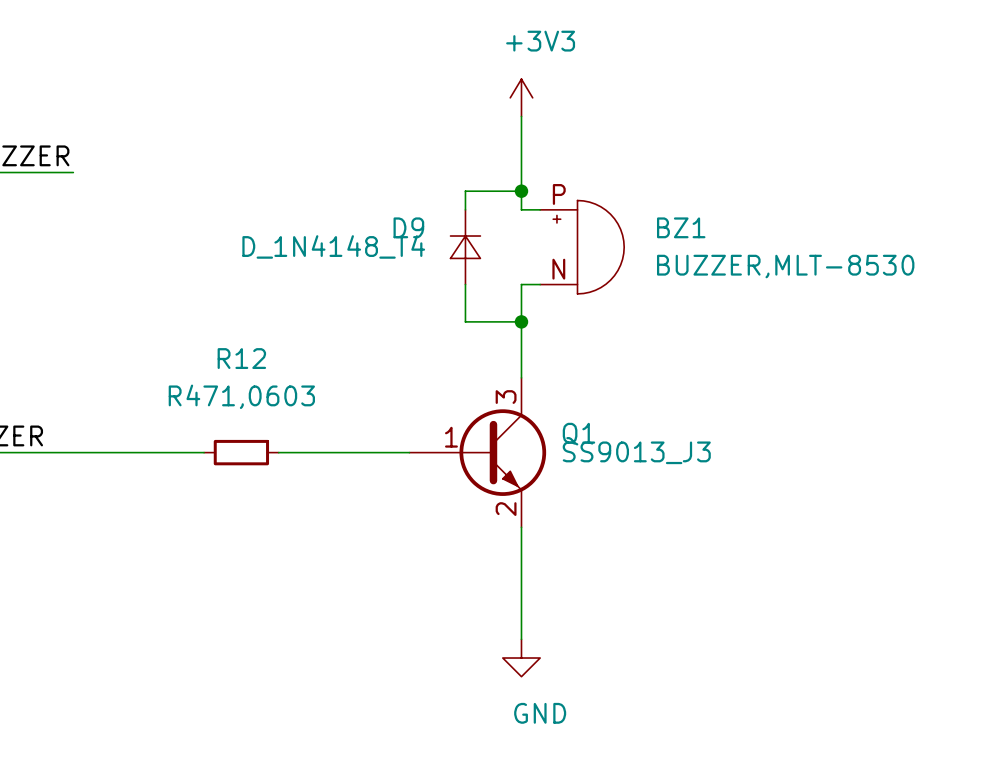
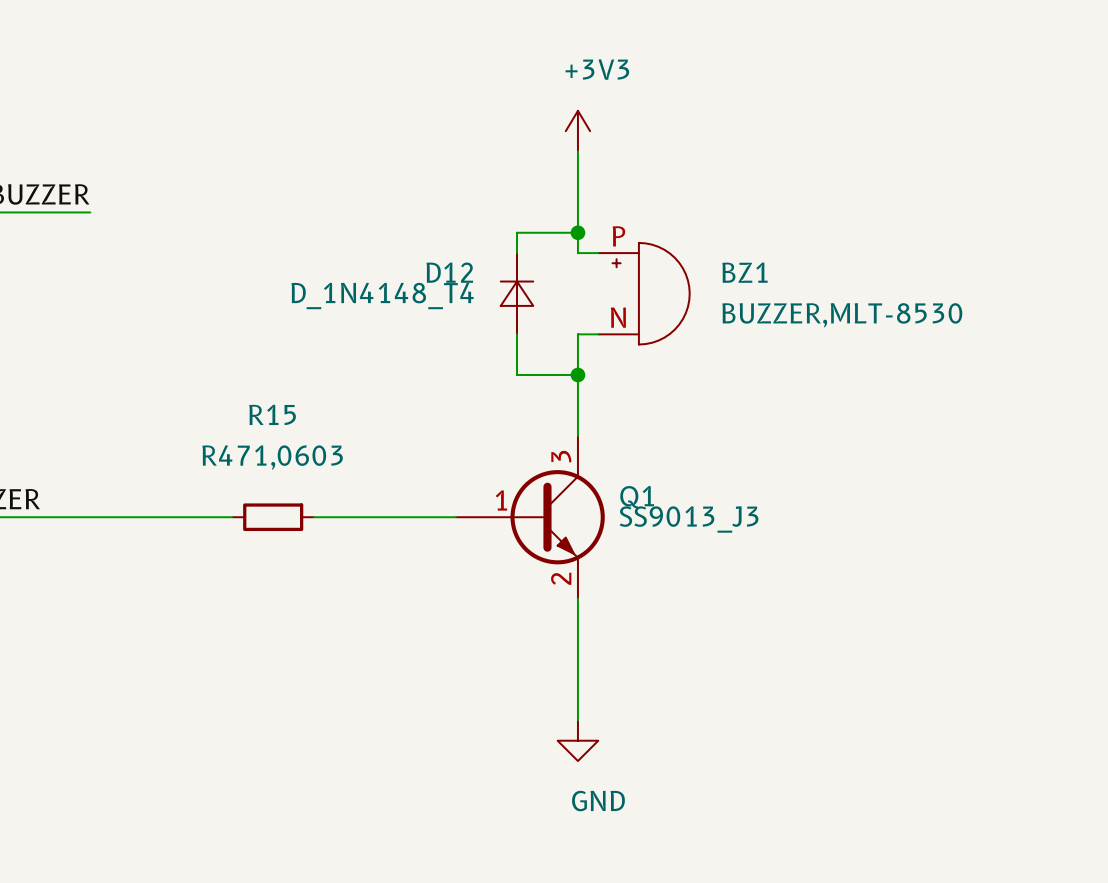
D9 name: D9 (408, 227) -> D12 (449, 272)
R12 name: R12 (241, 358) -> R15 (272, 414)

